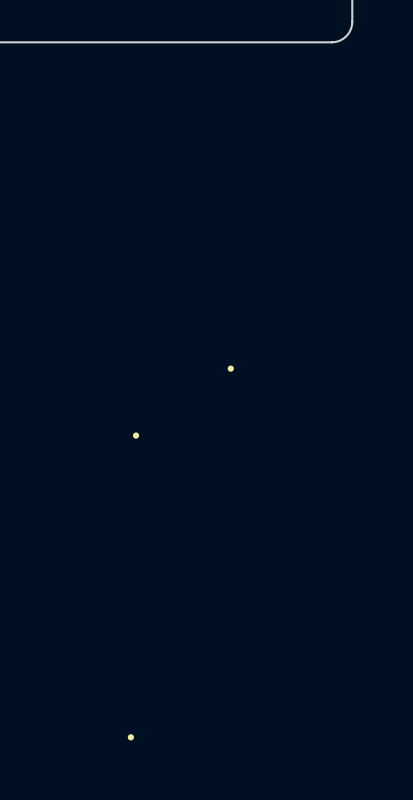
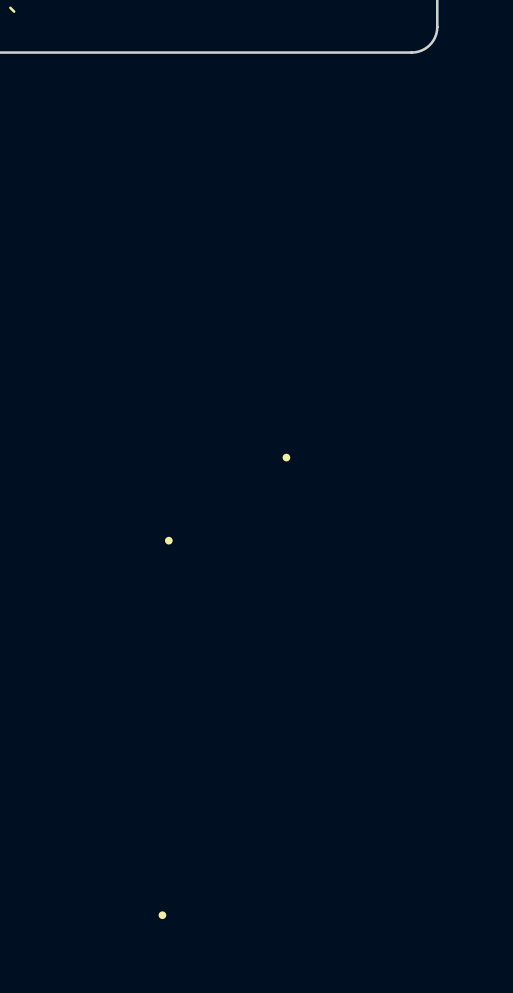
line: none -> (10, 7) (14, 11)

